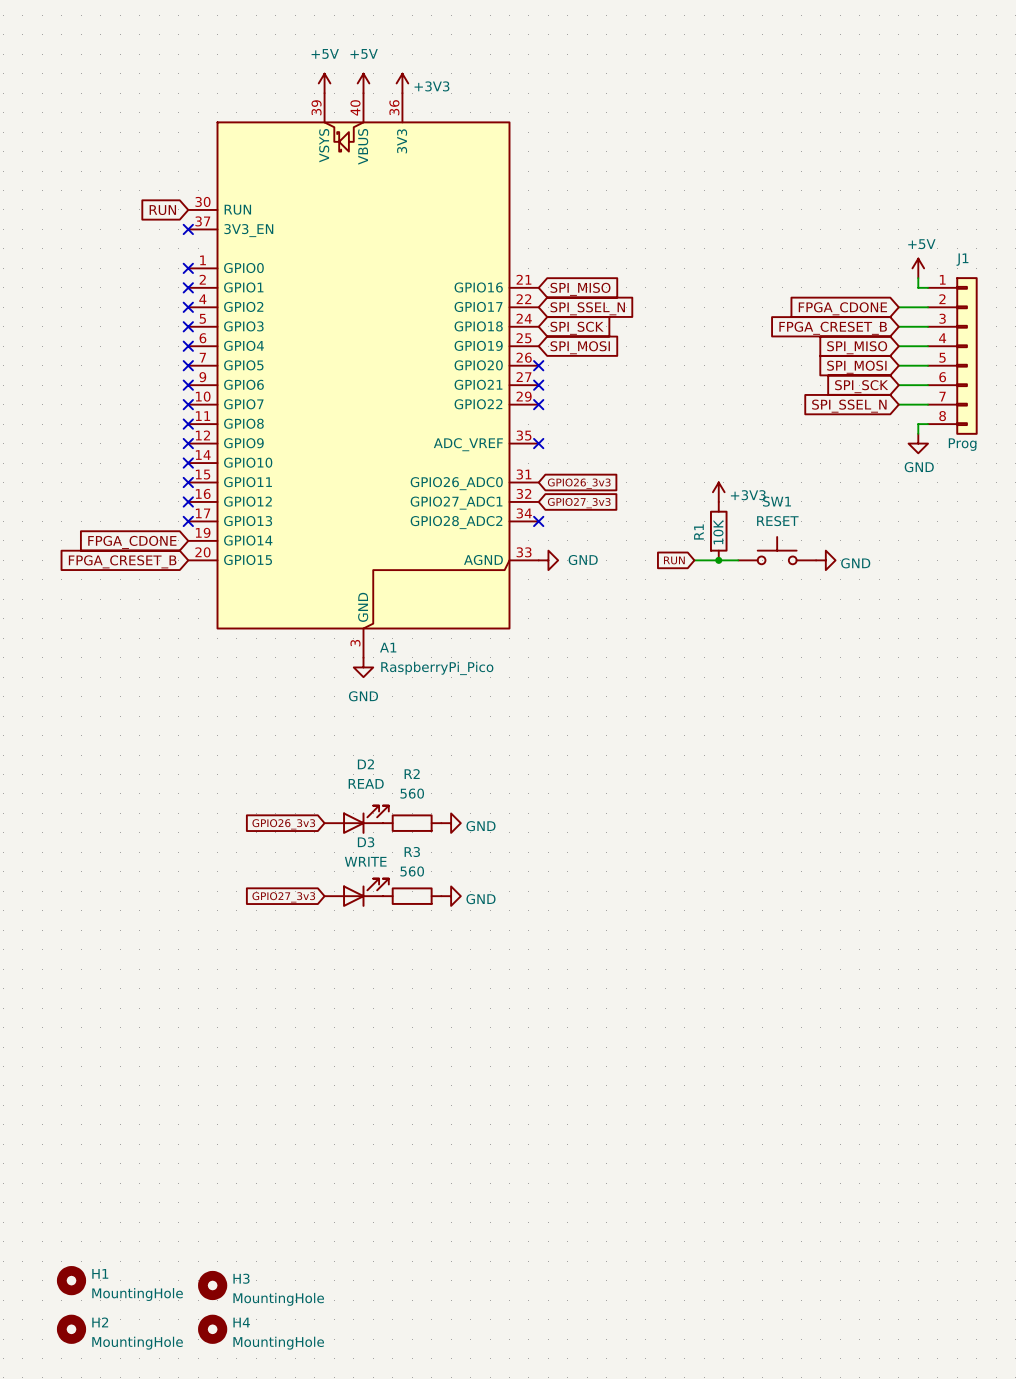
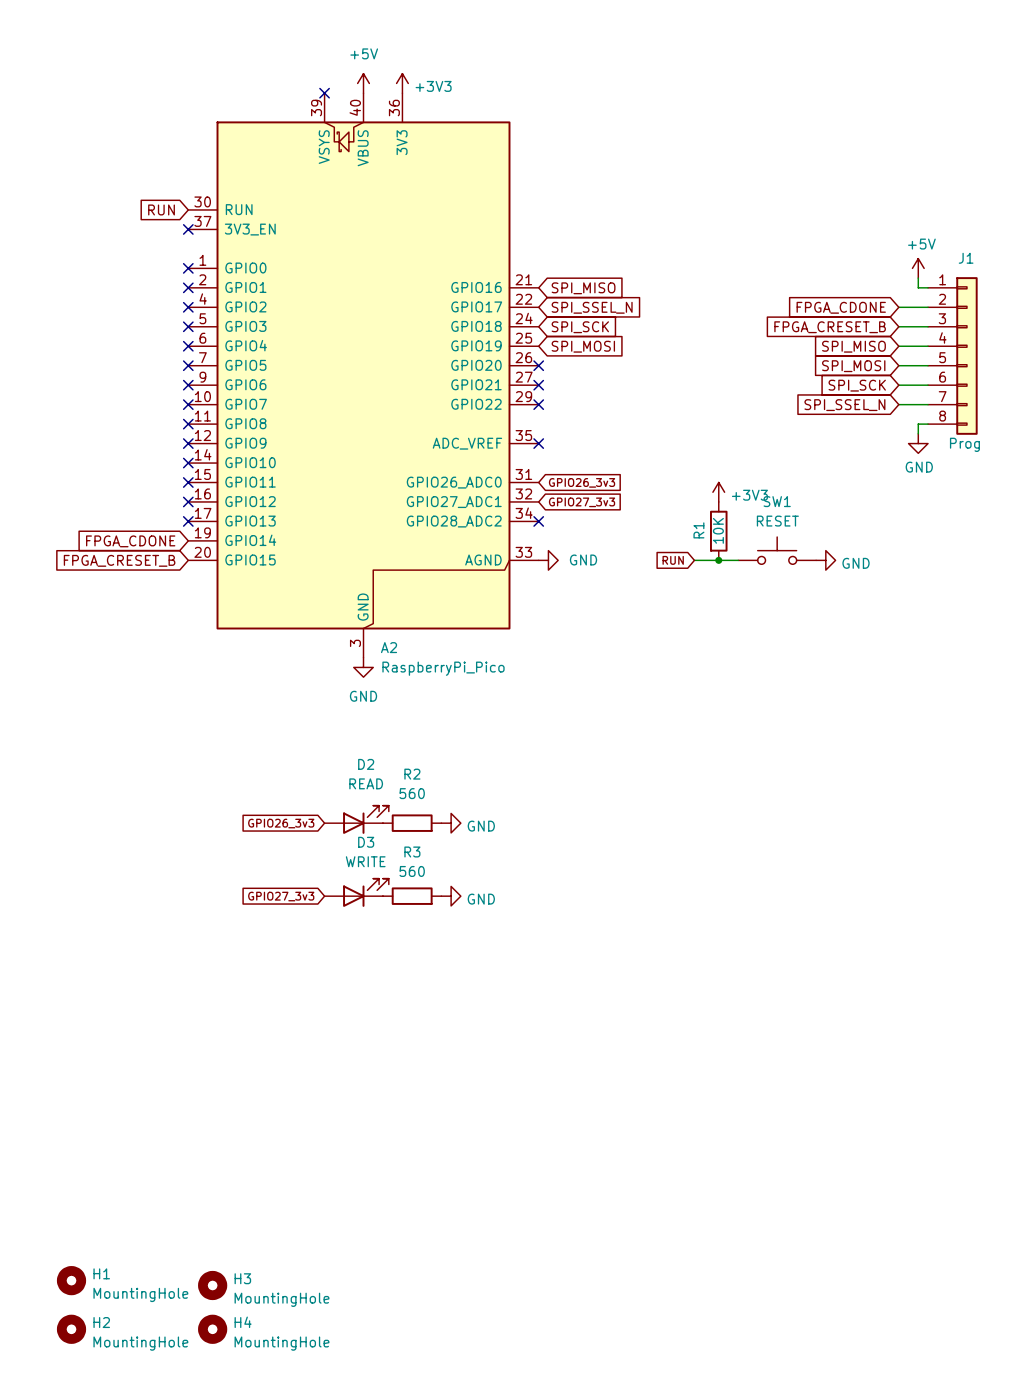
power symbol: +5V (324, 83) -> none
no-connect mark: none -> (324, 93)
A1 name: A1 (388, 647) -> A2 (389, 647)

